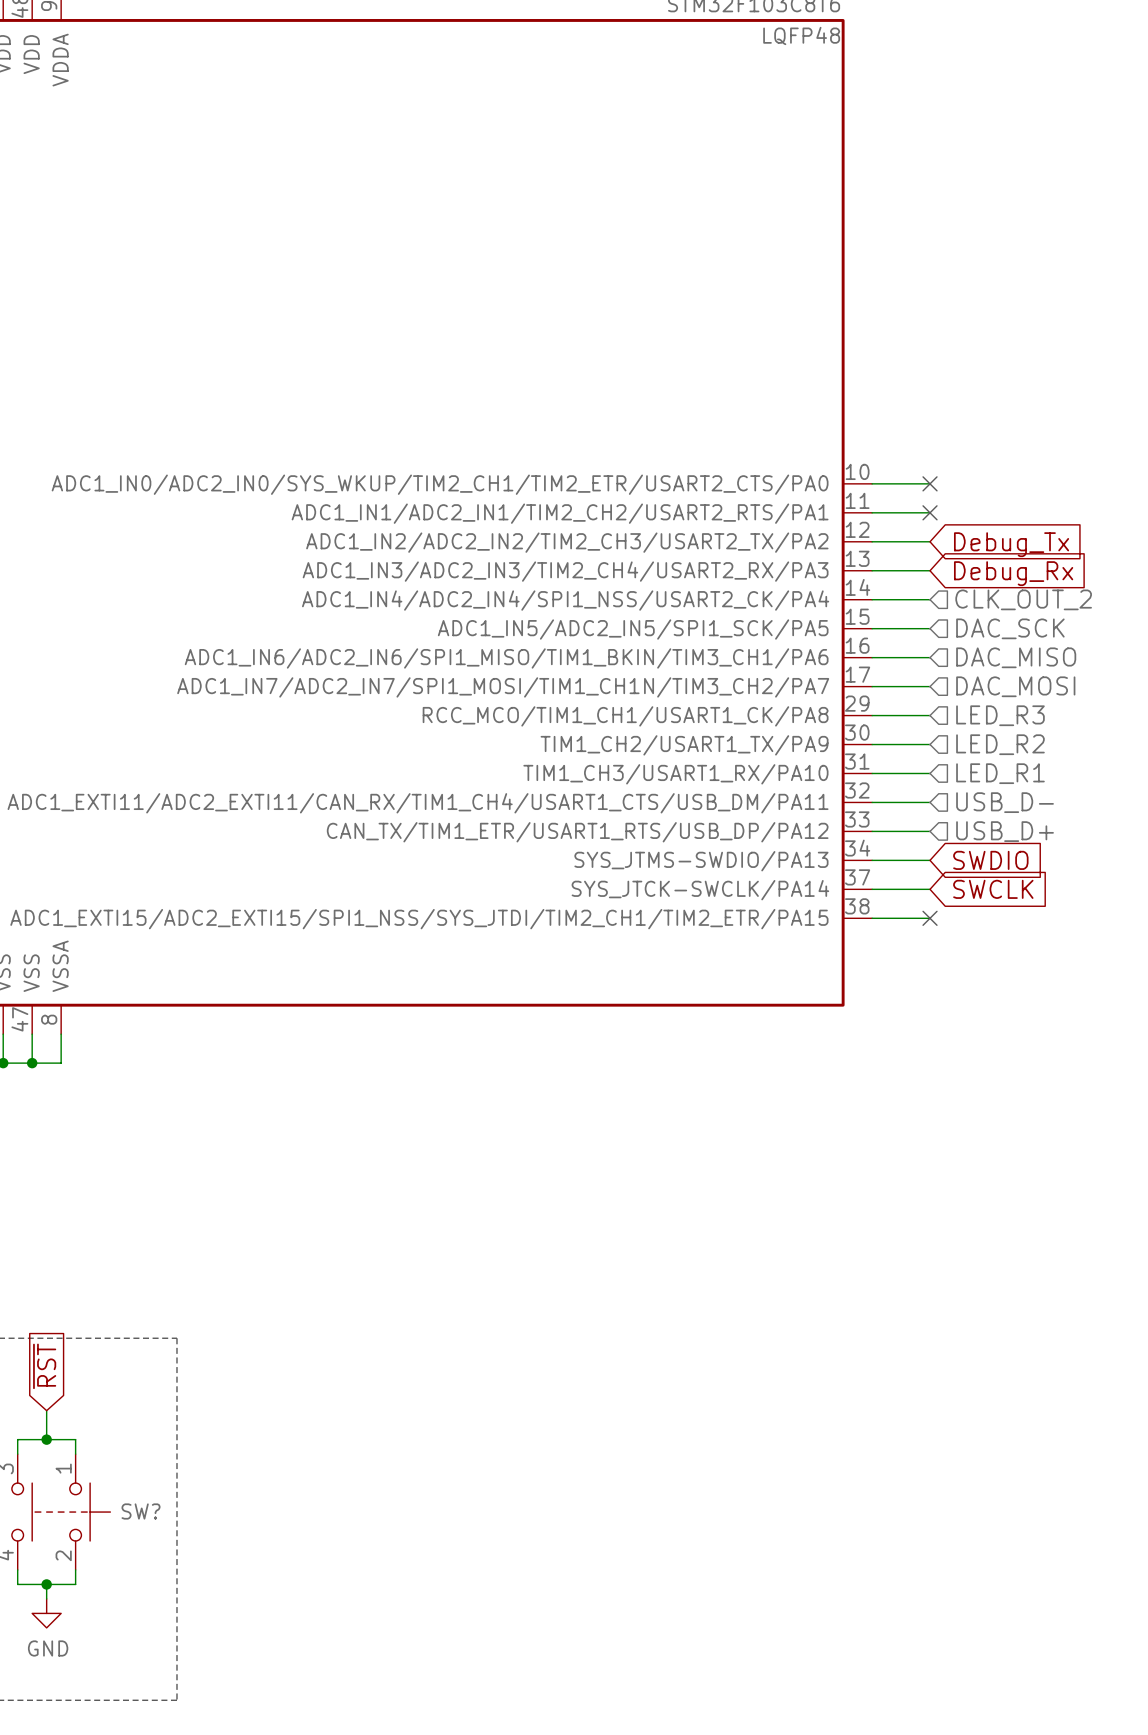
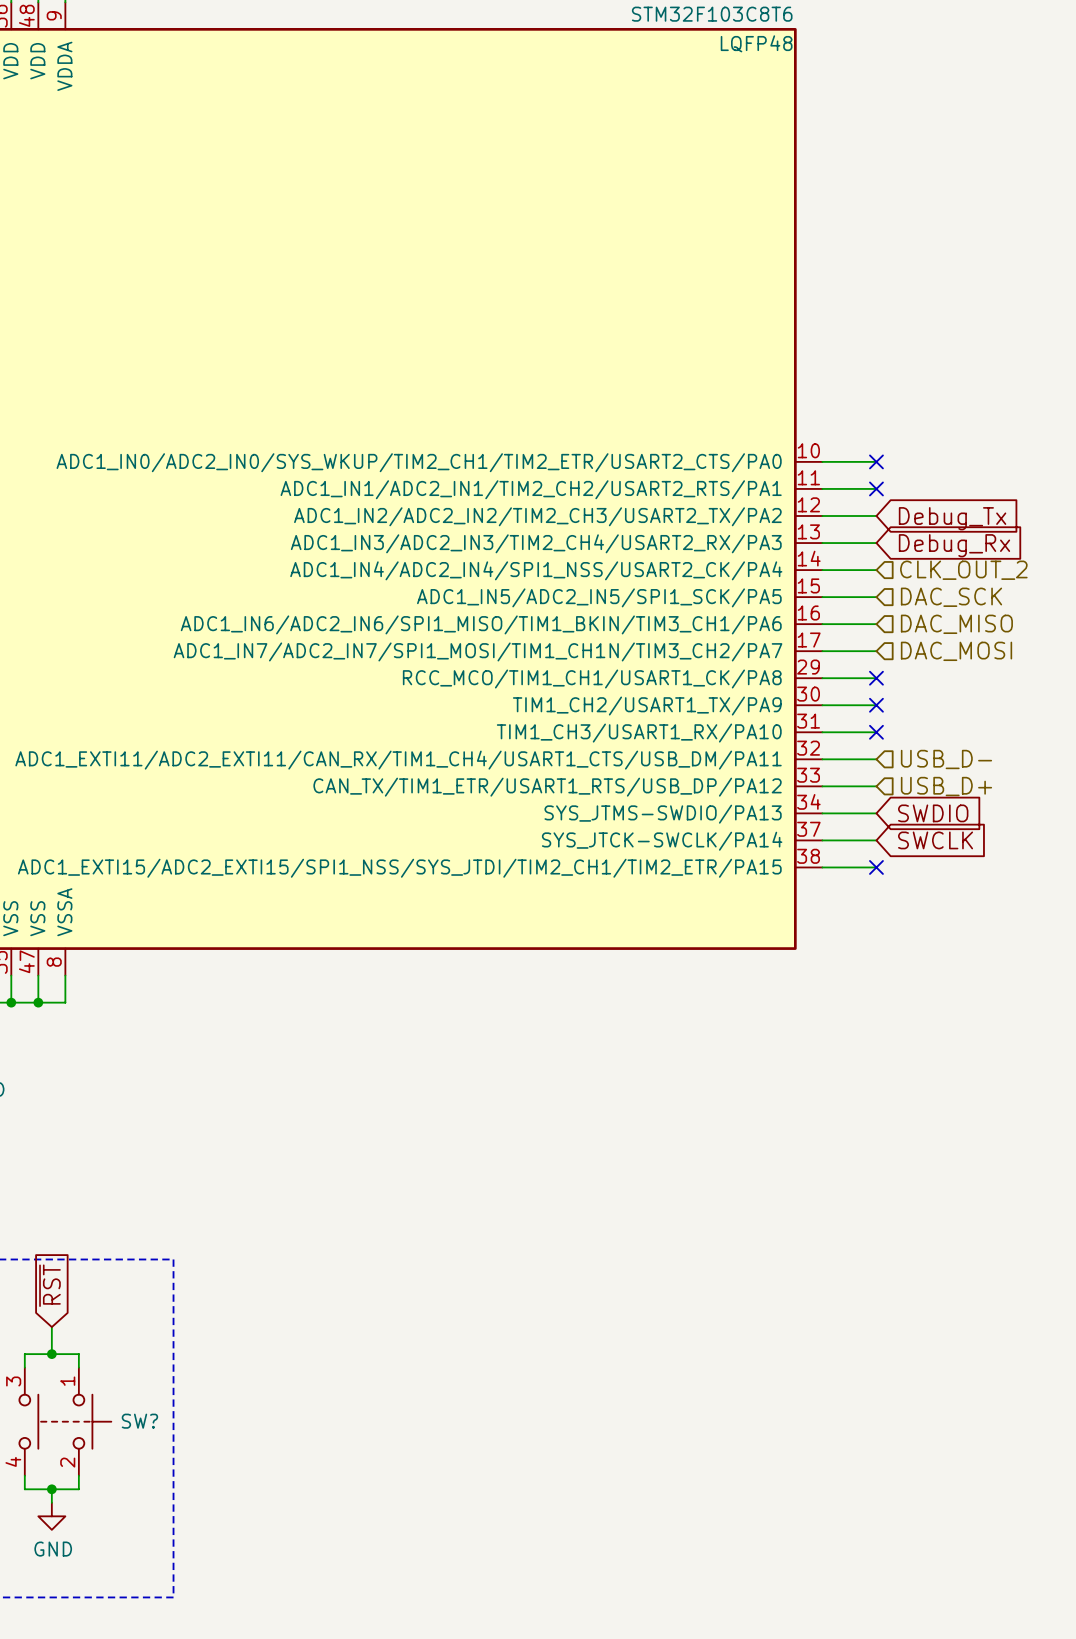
no-connect mark: none -> (876, 678)
hierarchical label: LED_R3 (1000, 715) -> none
no-connect mark: none -> (876, 705)
hierarchical label: LED_R2 (1000, 744) -> none
no-connect mark: none -> (876, 732)
hierarchical label: LED_R1 (1000, 773) -> none

